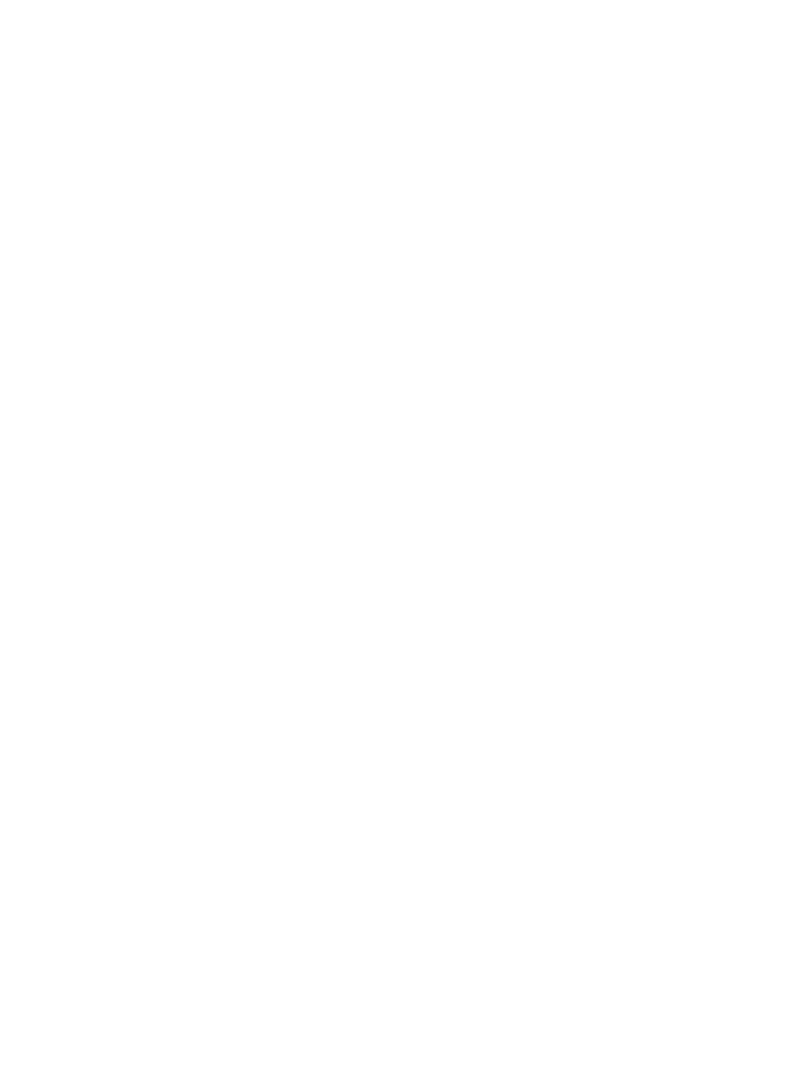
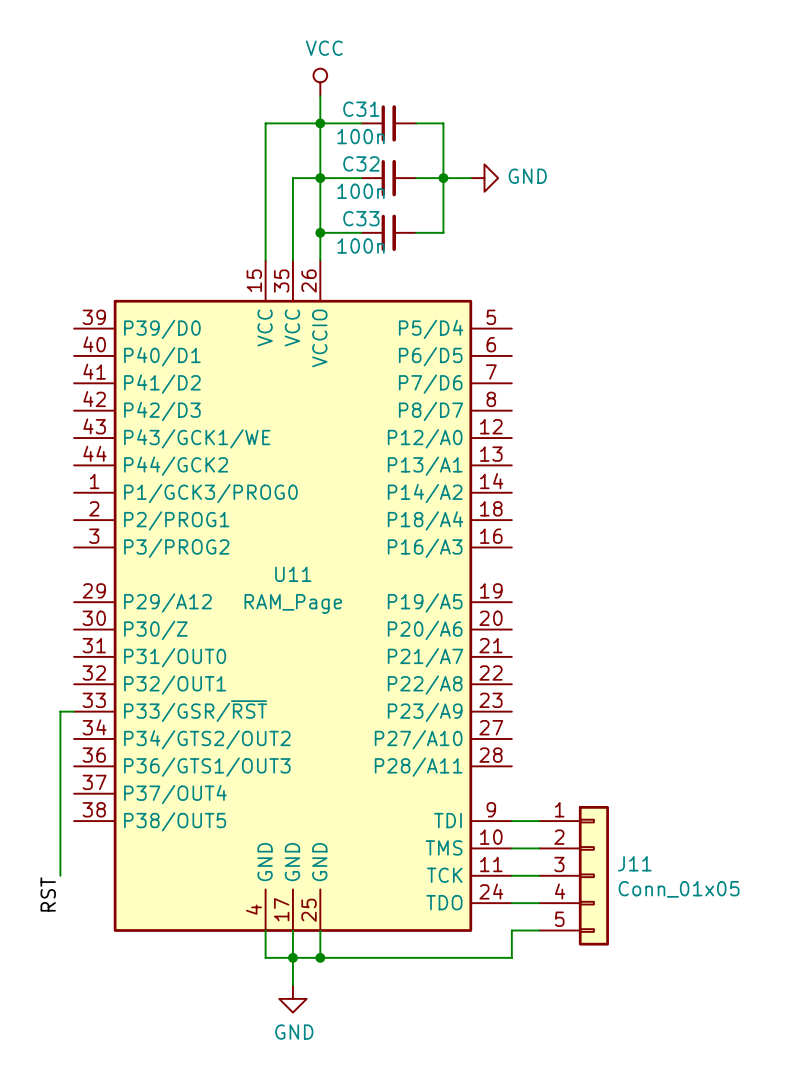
power symbol: none -> VCC (320, 82)
wire: none -> (320, 96) (320, 260)
junction: none -> (320, 123)
wire: none -> (361, 123) (265, 123) (265, 260)
C31: none -> 100n (388, 123)
wire: none -> (416, 123) (443, 123) (443, 232) (416, 232)
junction: none -> (320, 178)
wire: none -> (361, 178) (292, 178) (292, 260)
C32: none -> 100n (388, 178)
wire: none -> (416, 178) (470, 178)
junction: none -> (443, 178)
power symbol: none -> GND (484, 178)
wire: none -> (320, 232) (361, 232)
junction: none -> (320, 232)
C33: none -> 100n (388, 232)
U11: none -> RAM_Page (292, 596)
wire: none -> (74, 711) (60, 711) (60, 875)
wire: none -> (511, 821) (539, 821)
wire: none -> (511, 848) (539, 848)
wire: none -> (511, 875) (539, 875)
J11: none -> Conn_01x05 (574, 875)
label: none -> RST (48, 894)
wire: none -> (511, 903) (539, 903)
wire: none -> (265, 930) (265, 957) (511, 957) (511, 930) (539, 930)
wire: none -> (292, 930) (292, 985)
wire: none -> (320, 930) (320, 957)
junction: none -> (292, 957)
junction: none -> (320, 957)
power symbol: none -> GND (292, 998)

